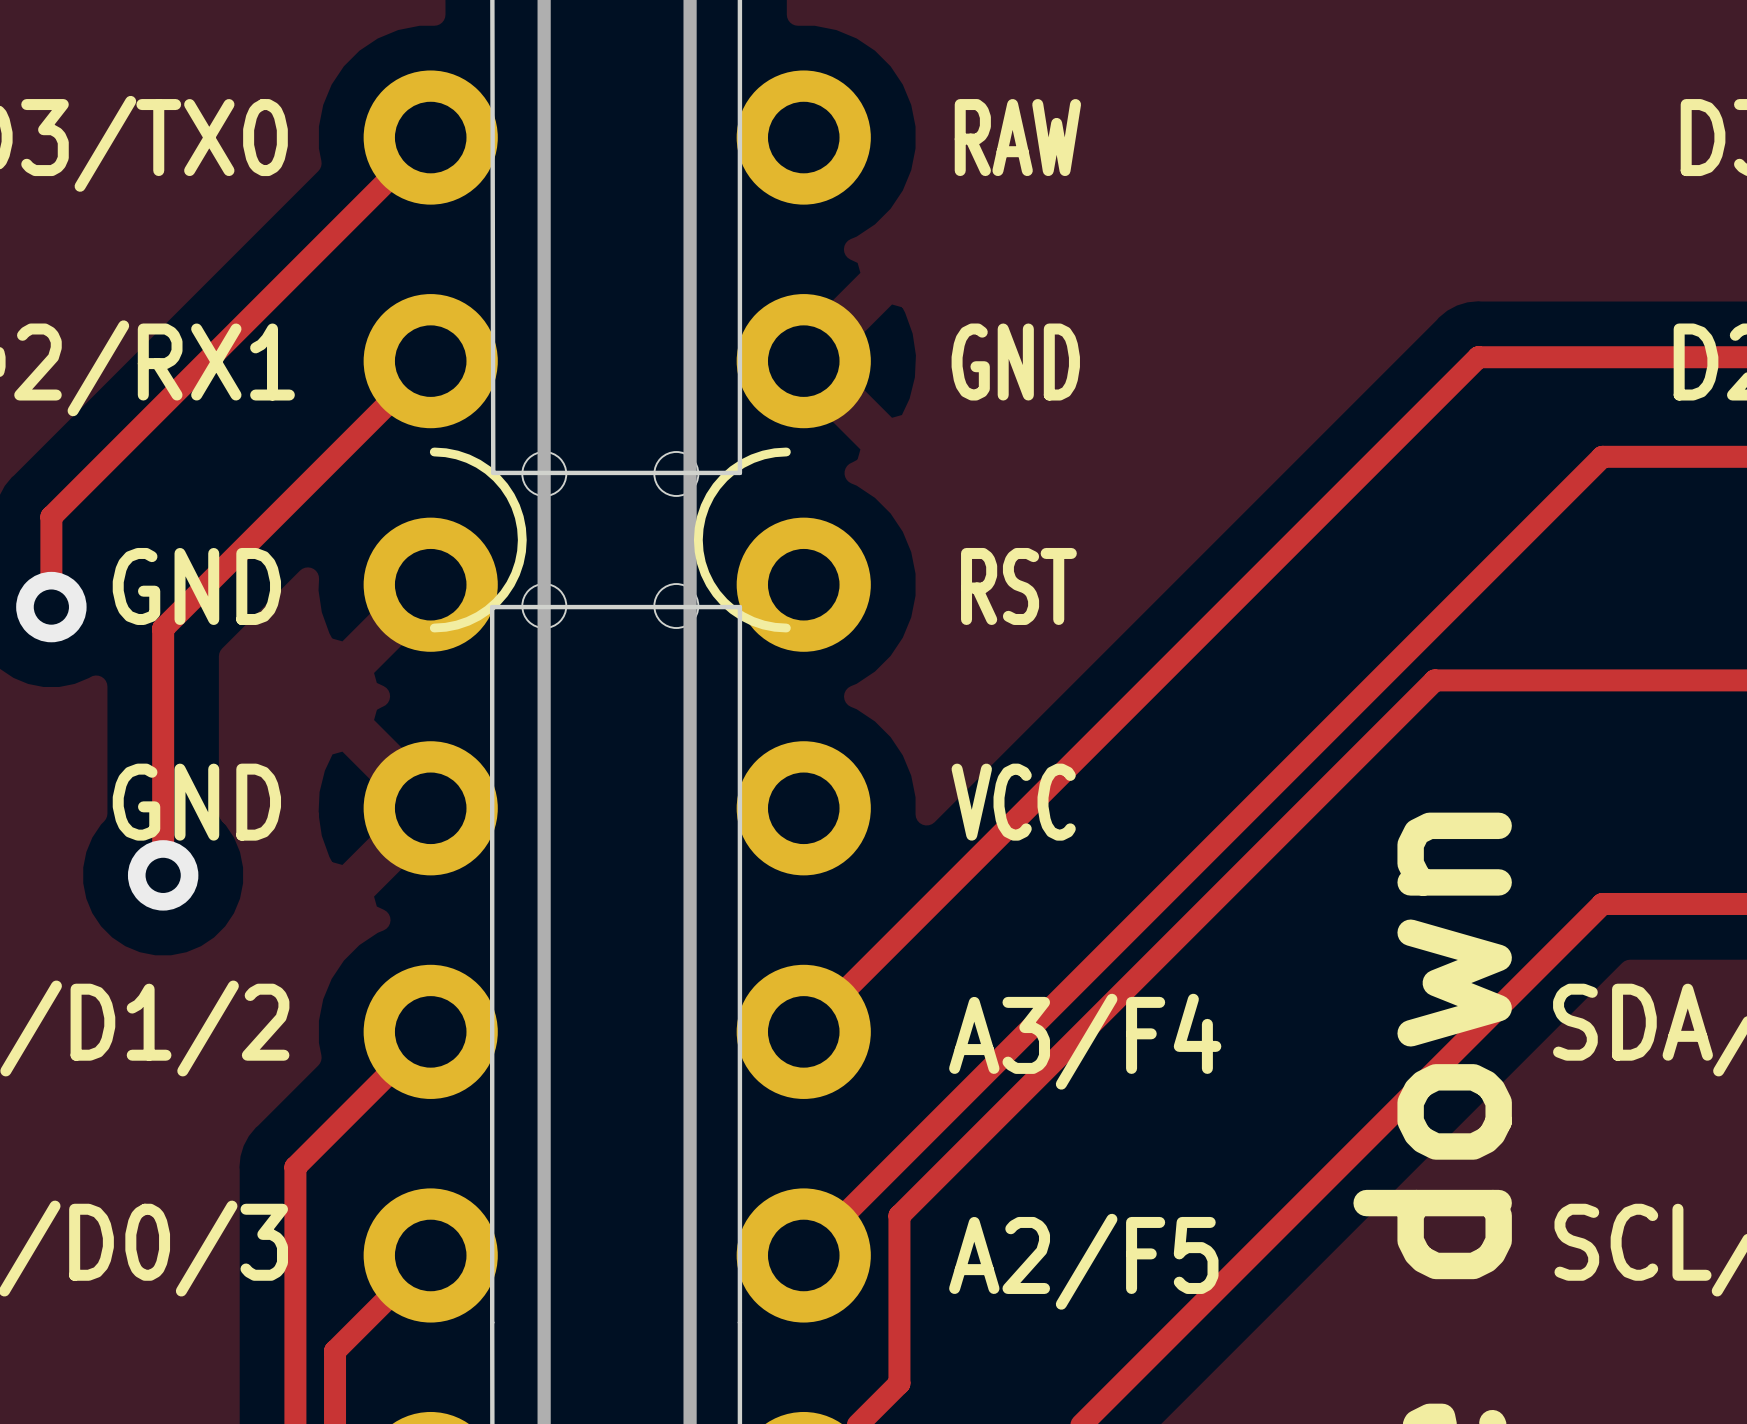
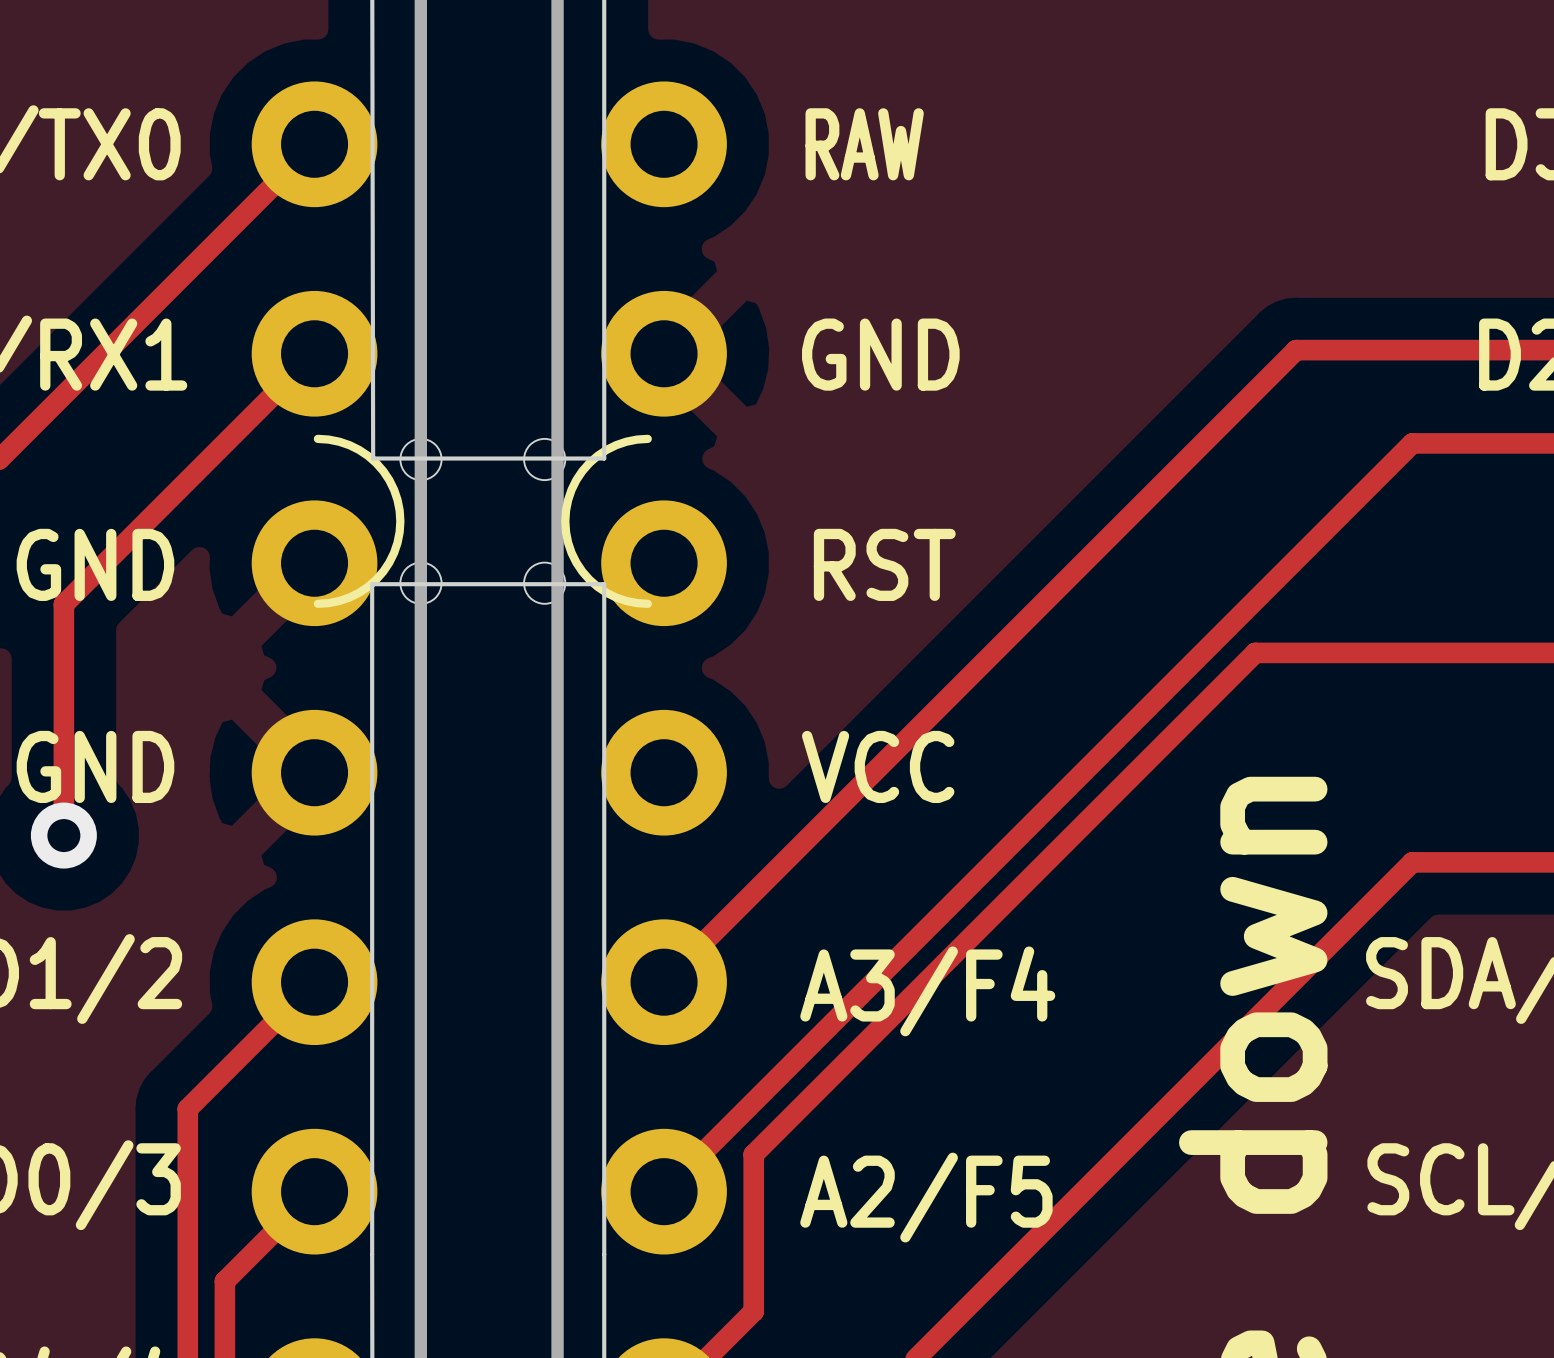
drawing position: (1015, 362) -> (880, 354)
drawing position: (1018, 586) -> (884, 564)
drawing position: (1013, 802) -> (878, 766)

